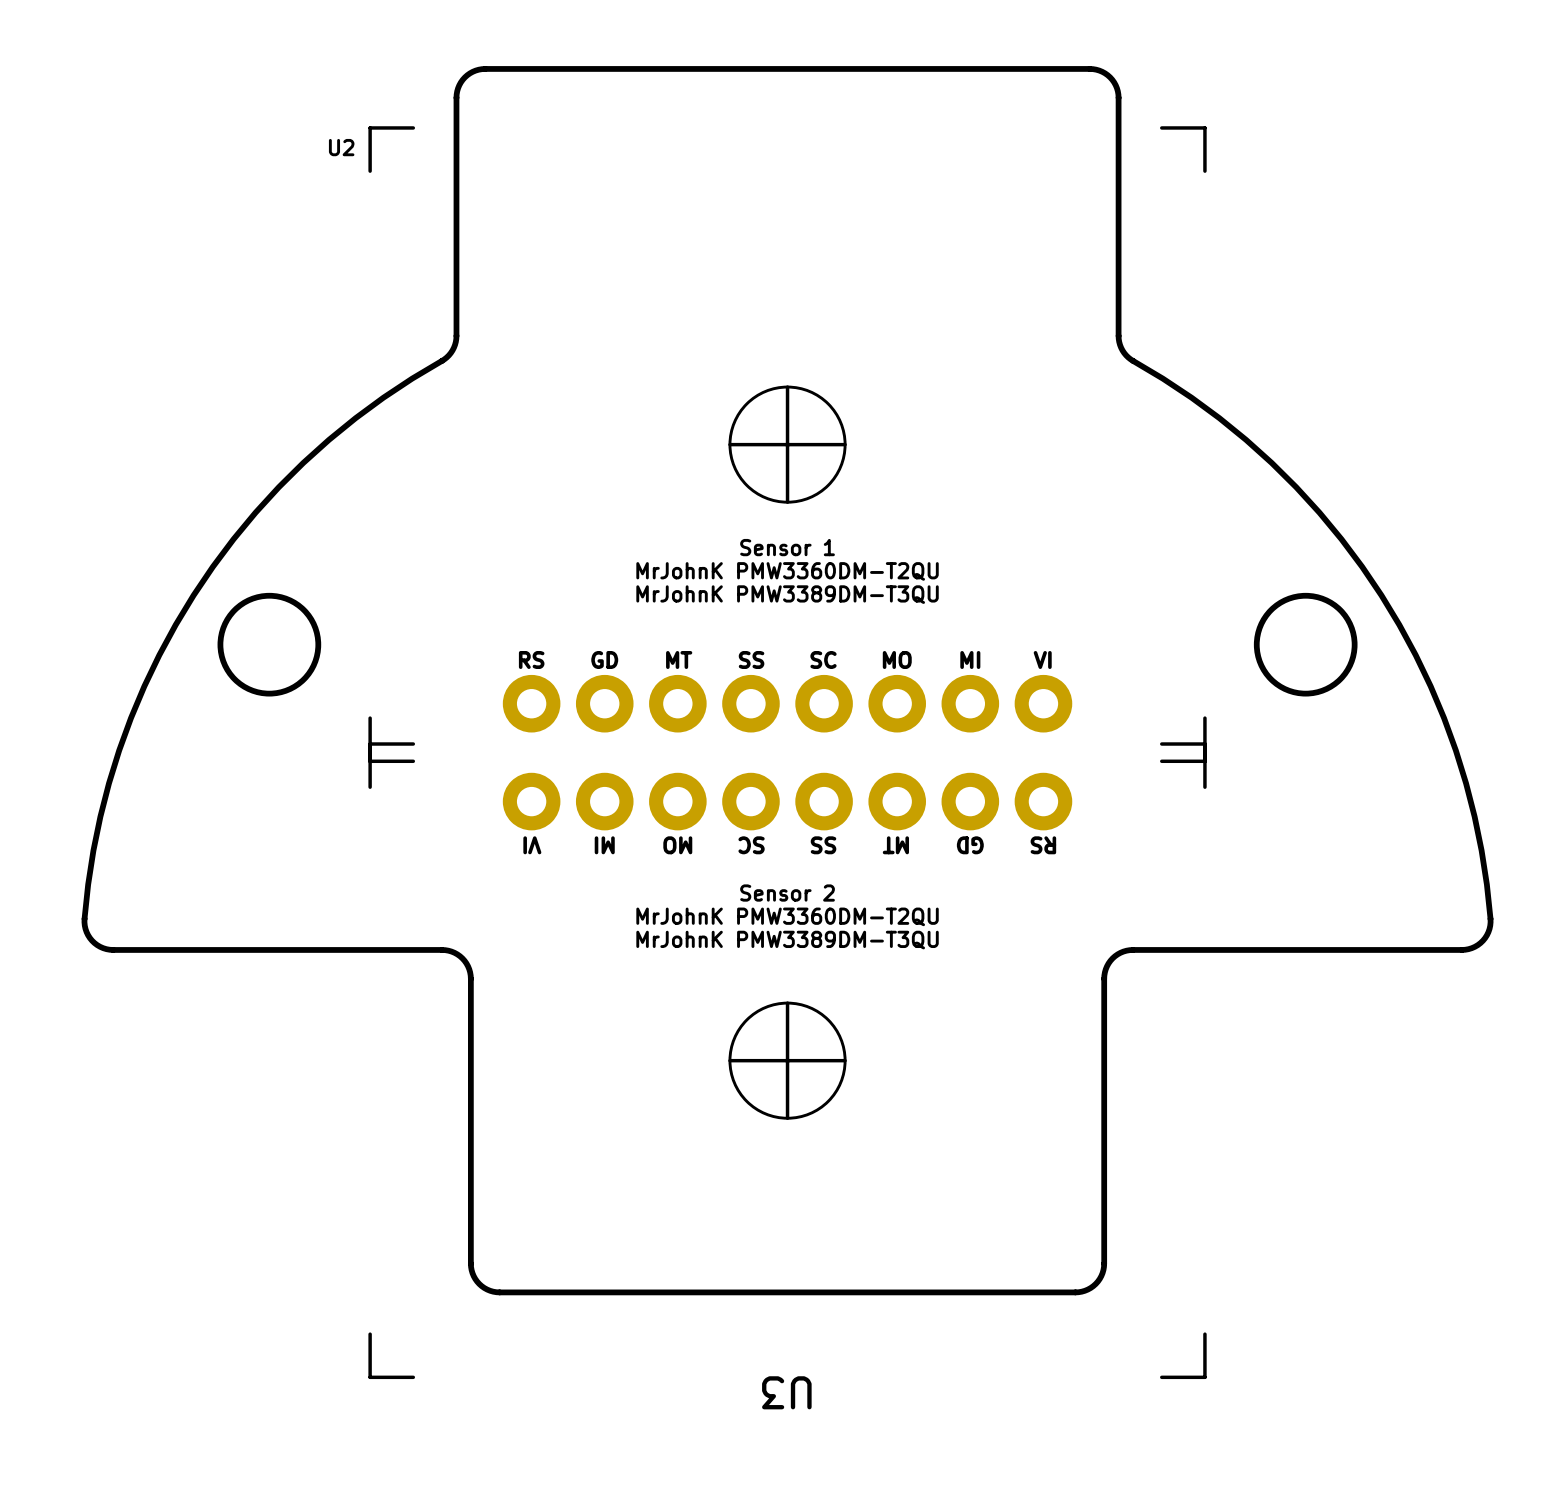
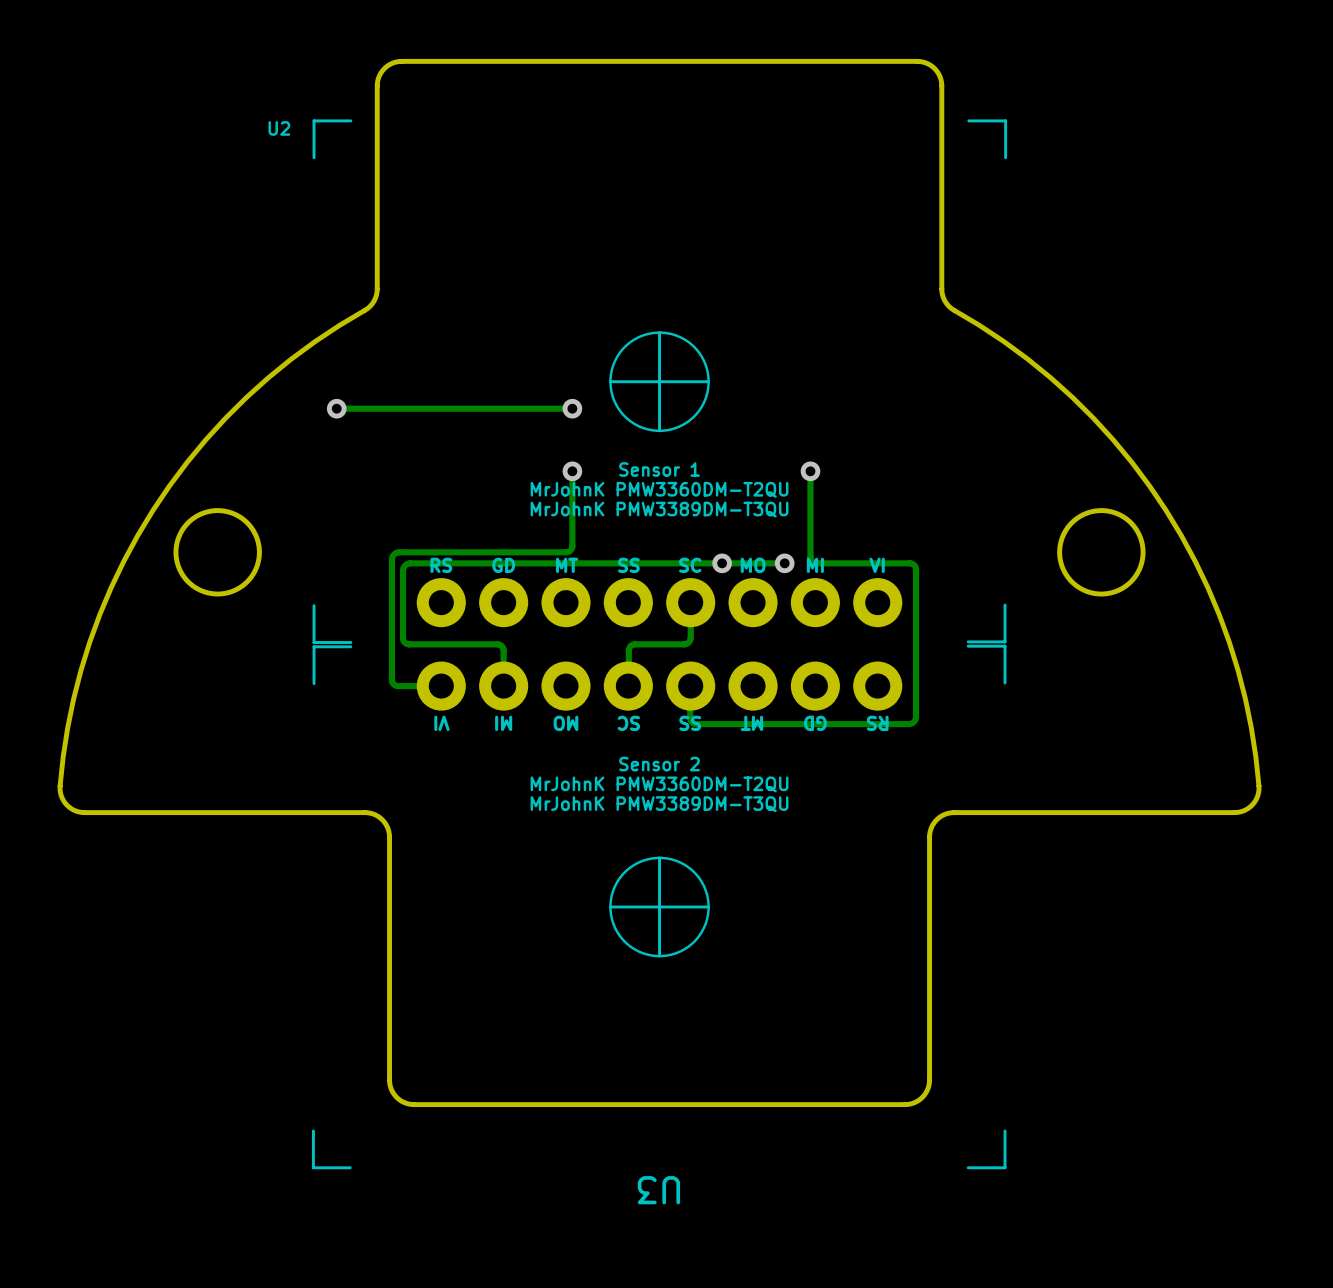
U2 footprint: [368, 126, 1207, 764] -> [312, 119, 1008, 644]
via: none -> (336, 408)
track: none -> (572, 408) (336, 408)
via: none -> (572, 408)
track: none -> (572, 471) (572, 546) (568, 551) (399, 552) (392, 555) (392, 681) (397, 686) (441, 686)
via: none -> (572, 471)
track: none -> (810, 471) (810, 557) (812, 561) (816, 563) (909, 563) (915, 566) (915, 720) (908, 724) (695, 724) (690, 718) (690, 686)
via: none -> (810, 471)
via: none -> (722, 563)
track: none -> (784, 563) (410, 563) (405, 564) (403, 570) (404, 642) (409, 644) (500, 644) (503, 649) (503, 686)
via: none -> (784, 563)
track: none -> (690, 602) (689, 641) (684, 644) (631, 645) (628, 649) (628, 686)
U3 footprint: [368, 742, 1207, 1380] -> [311, 644, 1007, 1170]

